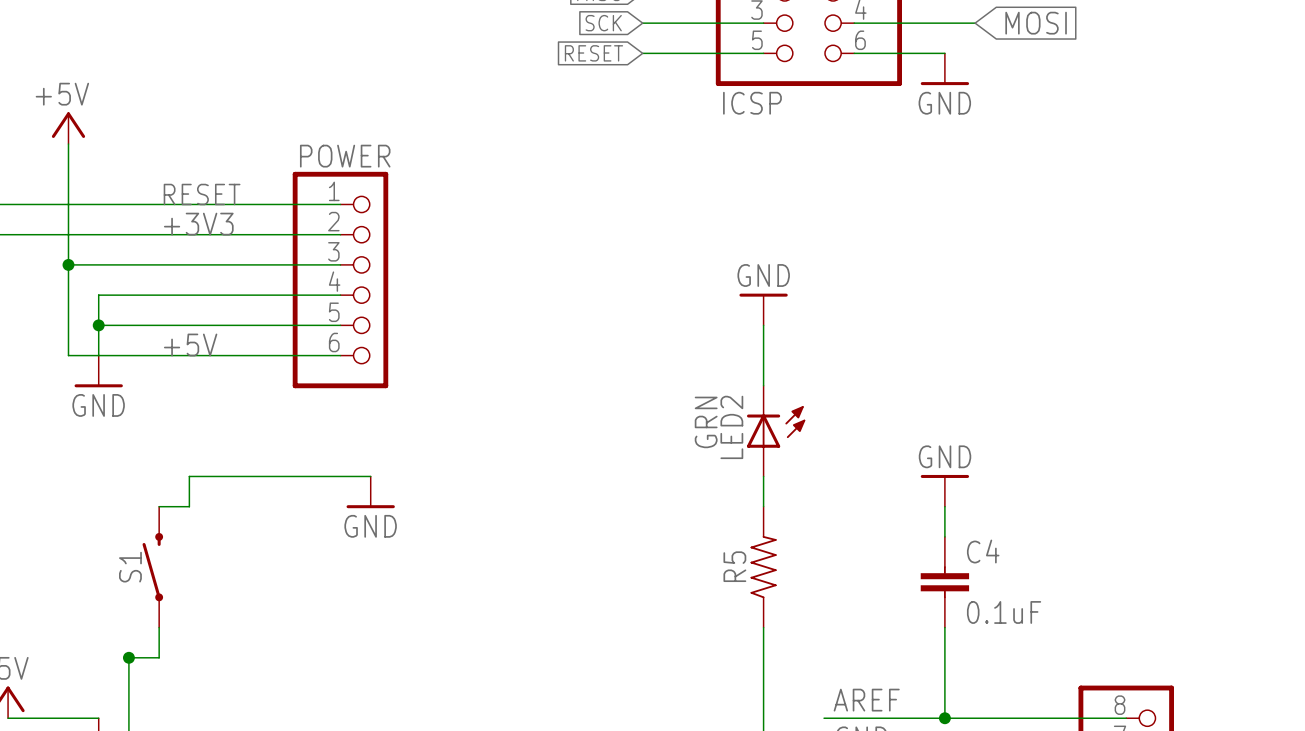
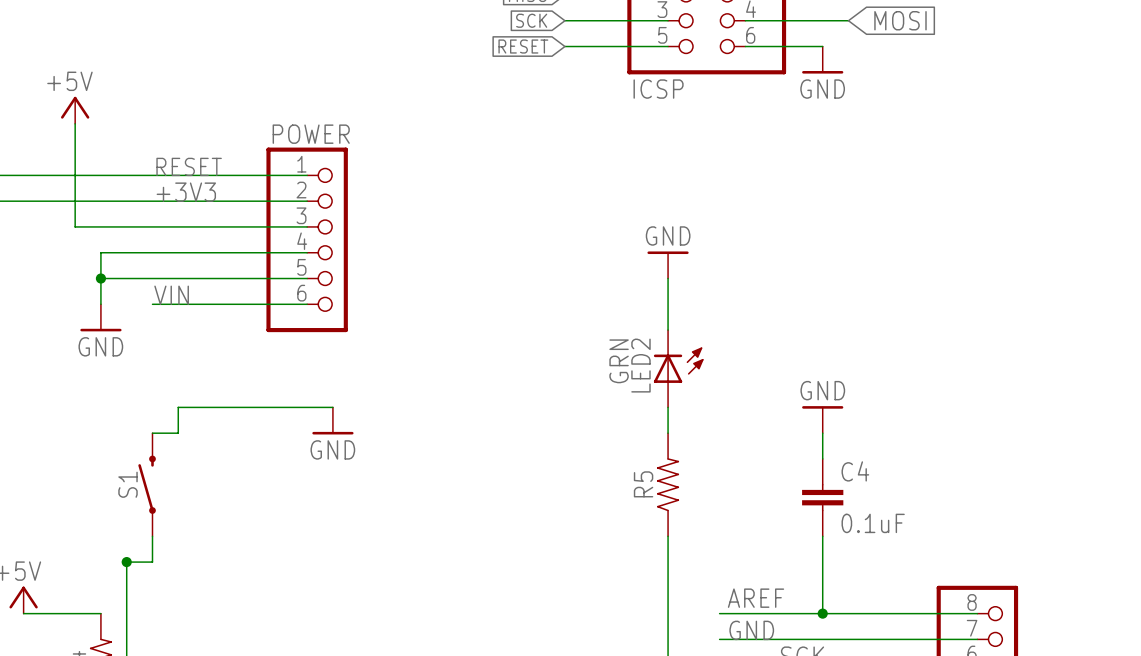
wire: (68, 264) (68, 355) (159, 355) -> none
junction: (68, 264) -> none
label: +5V (190, 345) -> VIN (171, 295)

